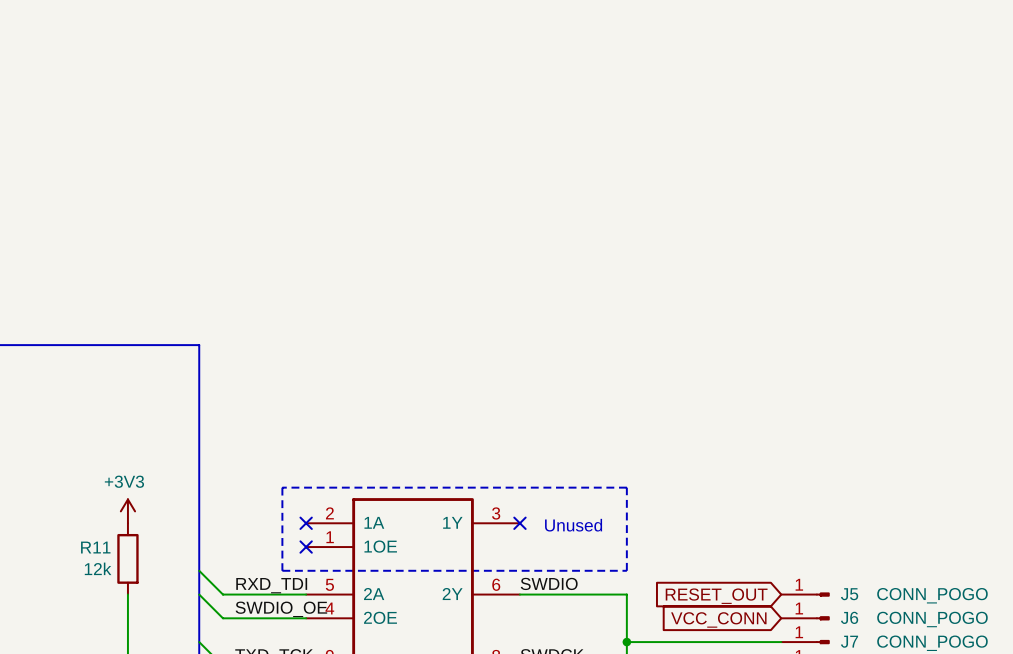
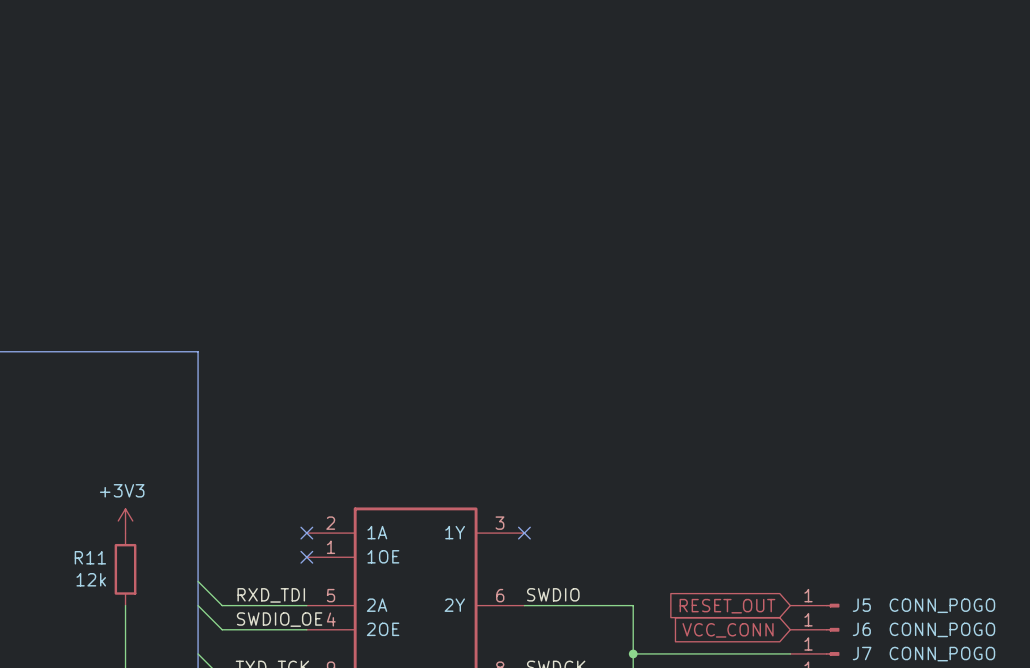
line: (282, 487) (626, 487) (626, 570) (282, 570) (282, 487) -> none
text: Unused (573, 525) -> none

